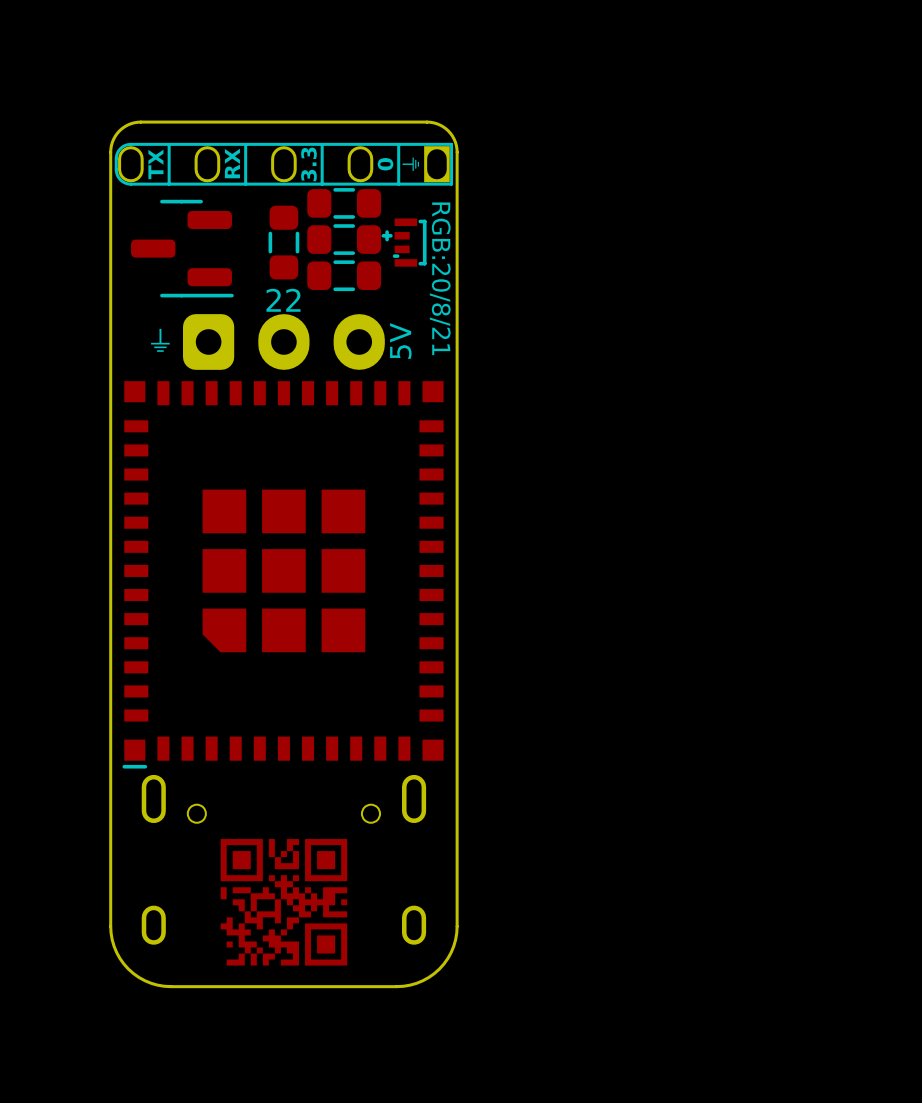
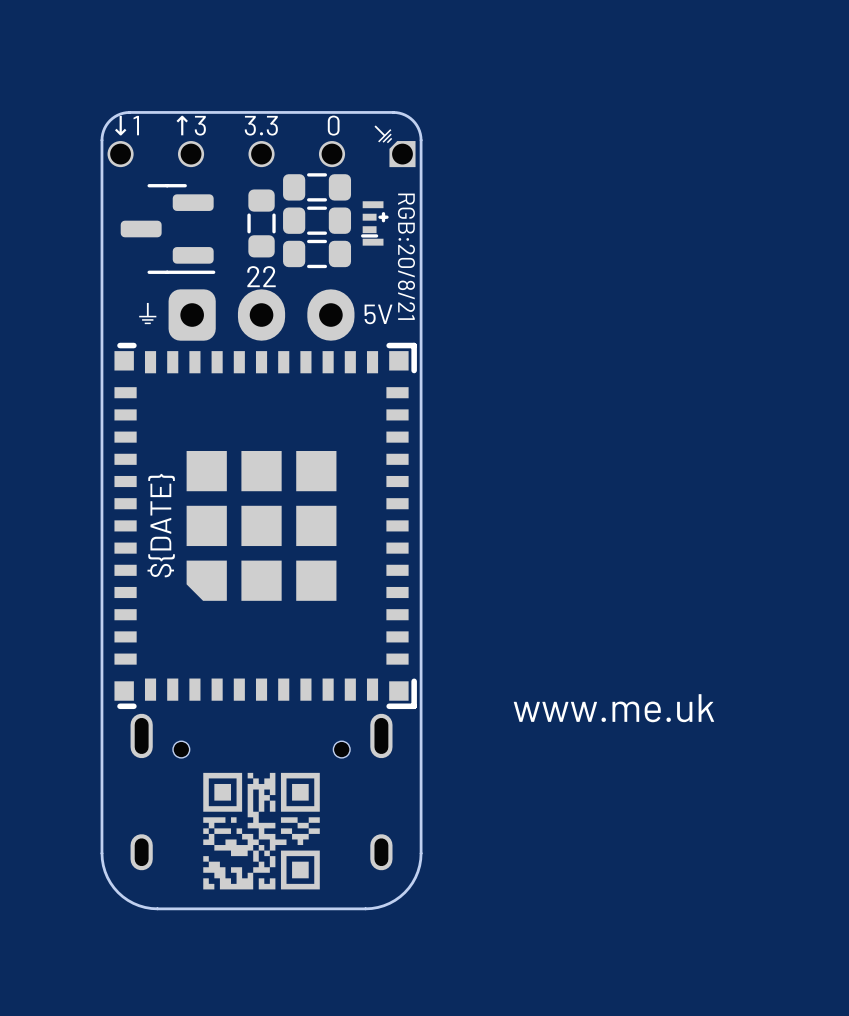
part footprint: [114, 142, 454, 186] -> [107, 141, 416, 168]
part footprint: [381, 218, 427, 267] -> [361, 201, 389, 246]
text rotation: 0° (400, 340) -> 90° clockwise (378, 314)
part footprint: [122, 381, 444, 769] -> [114, 342, 417, 710]
text: none -> www.me.uk (613, 708)
part footprint: [220, 839, 348, 966] -> [203, 772, 320, 890]

